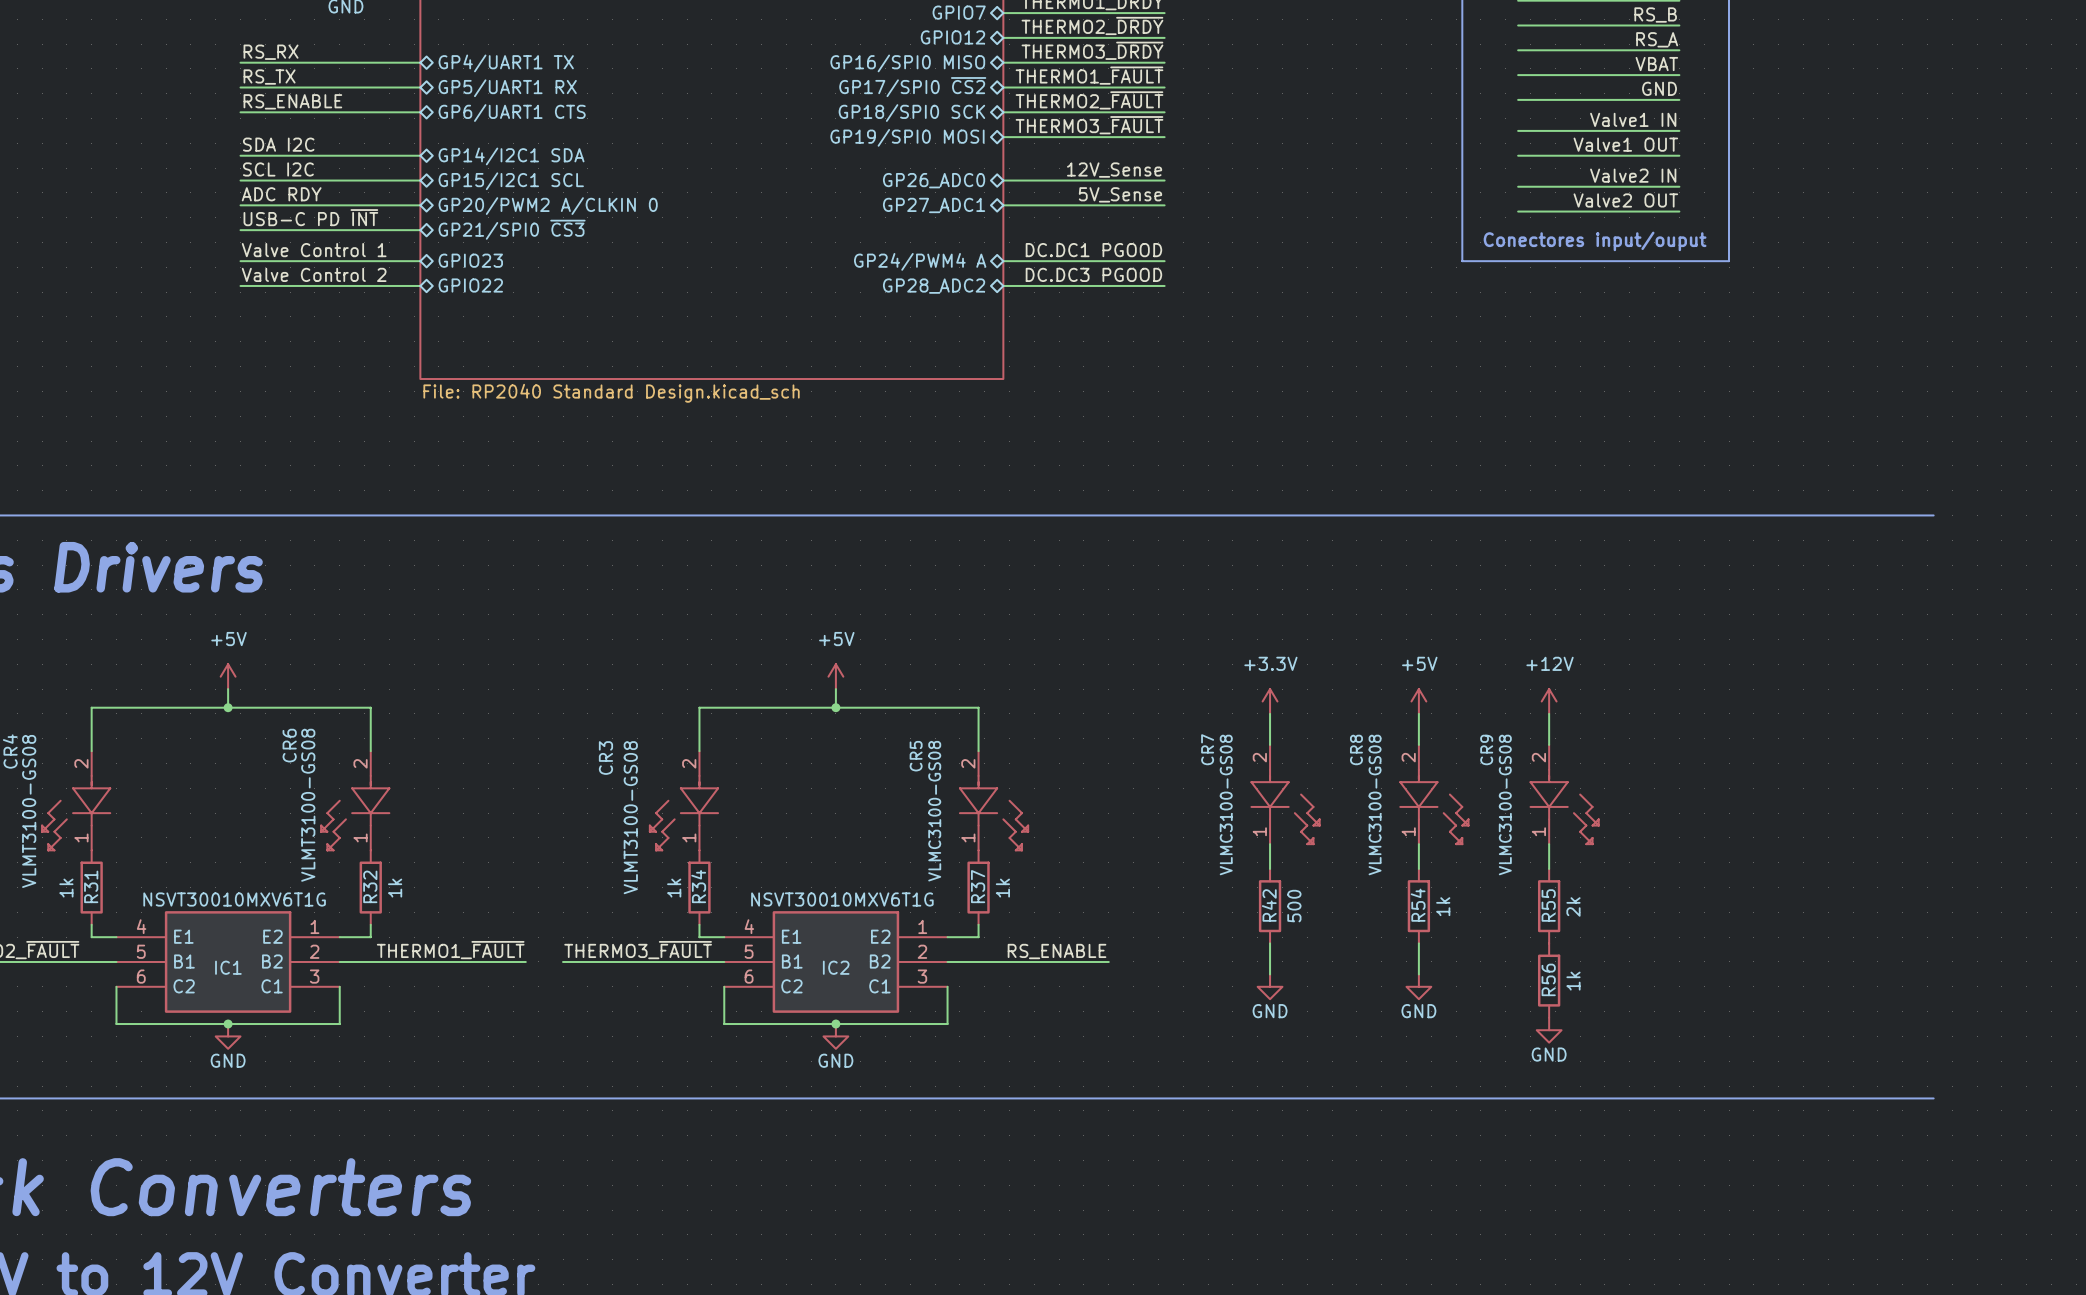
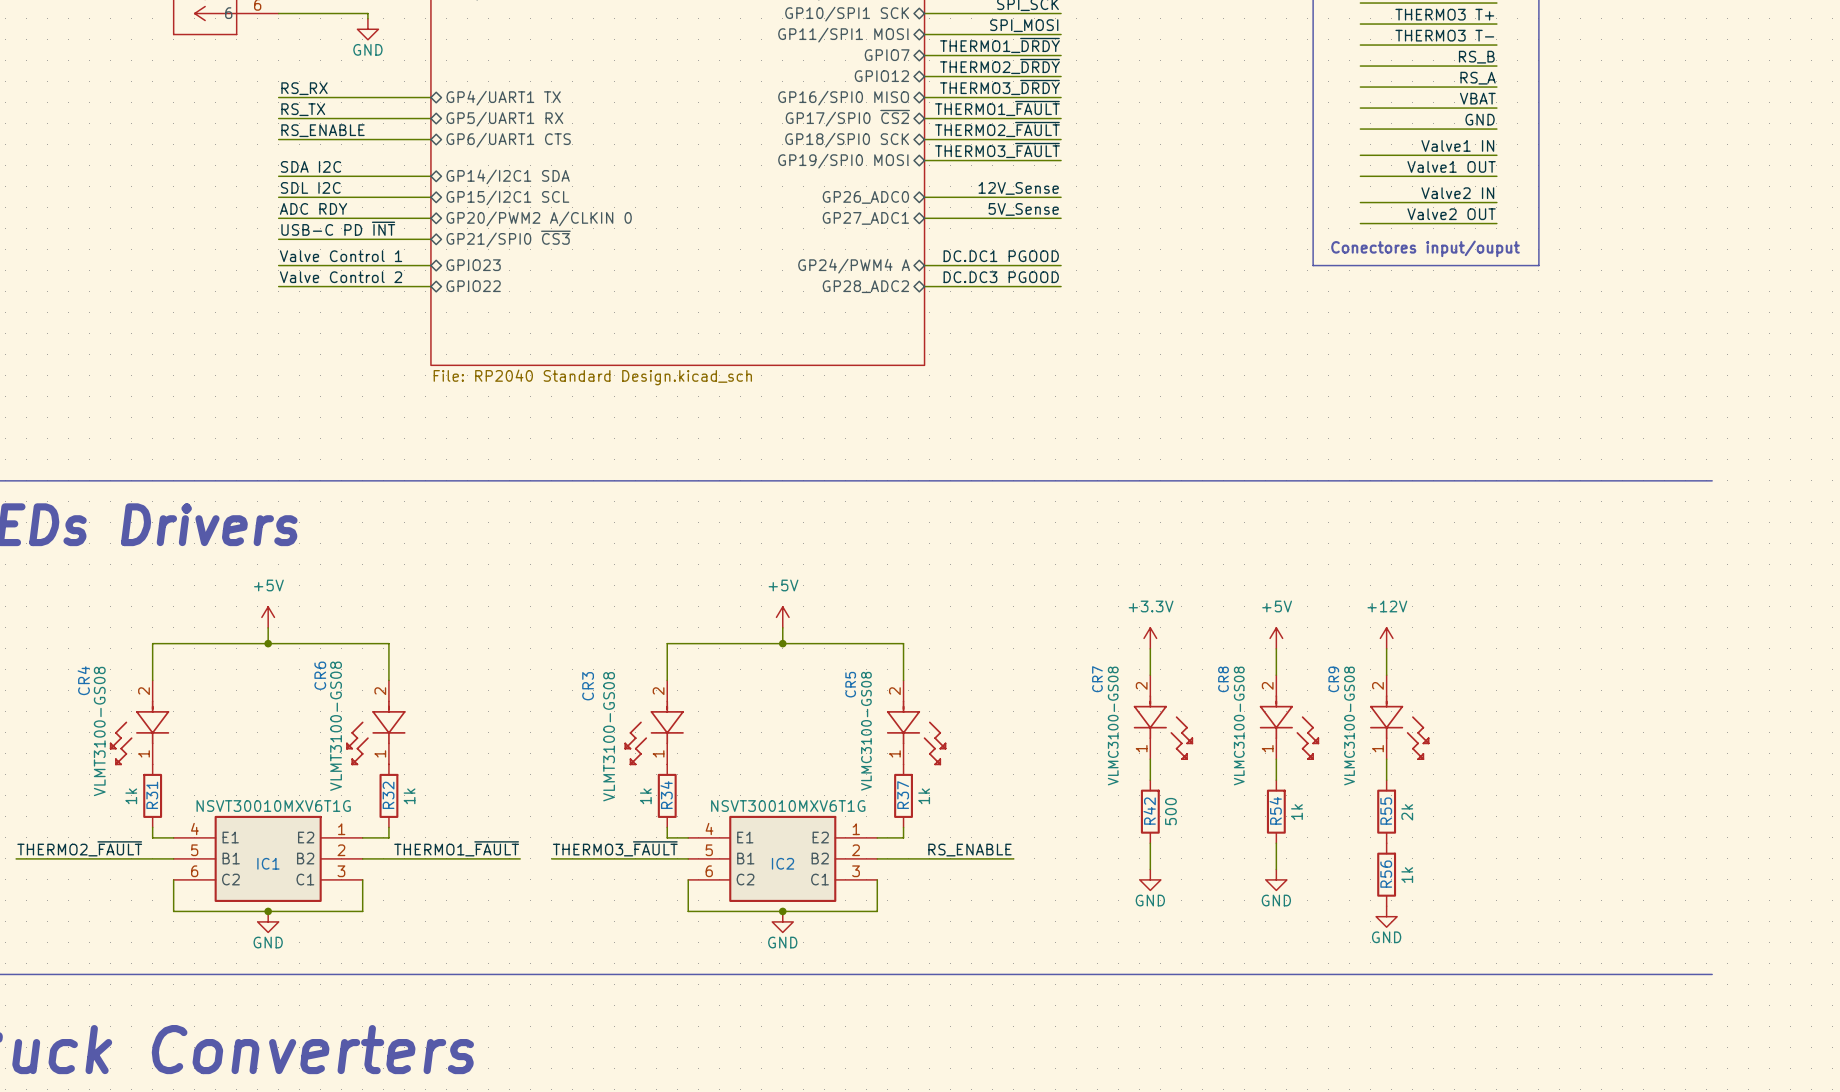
label: SCL I2C (278, 169) -> SDL I2C (310, 187)

